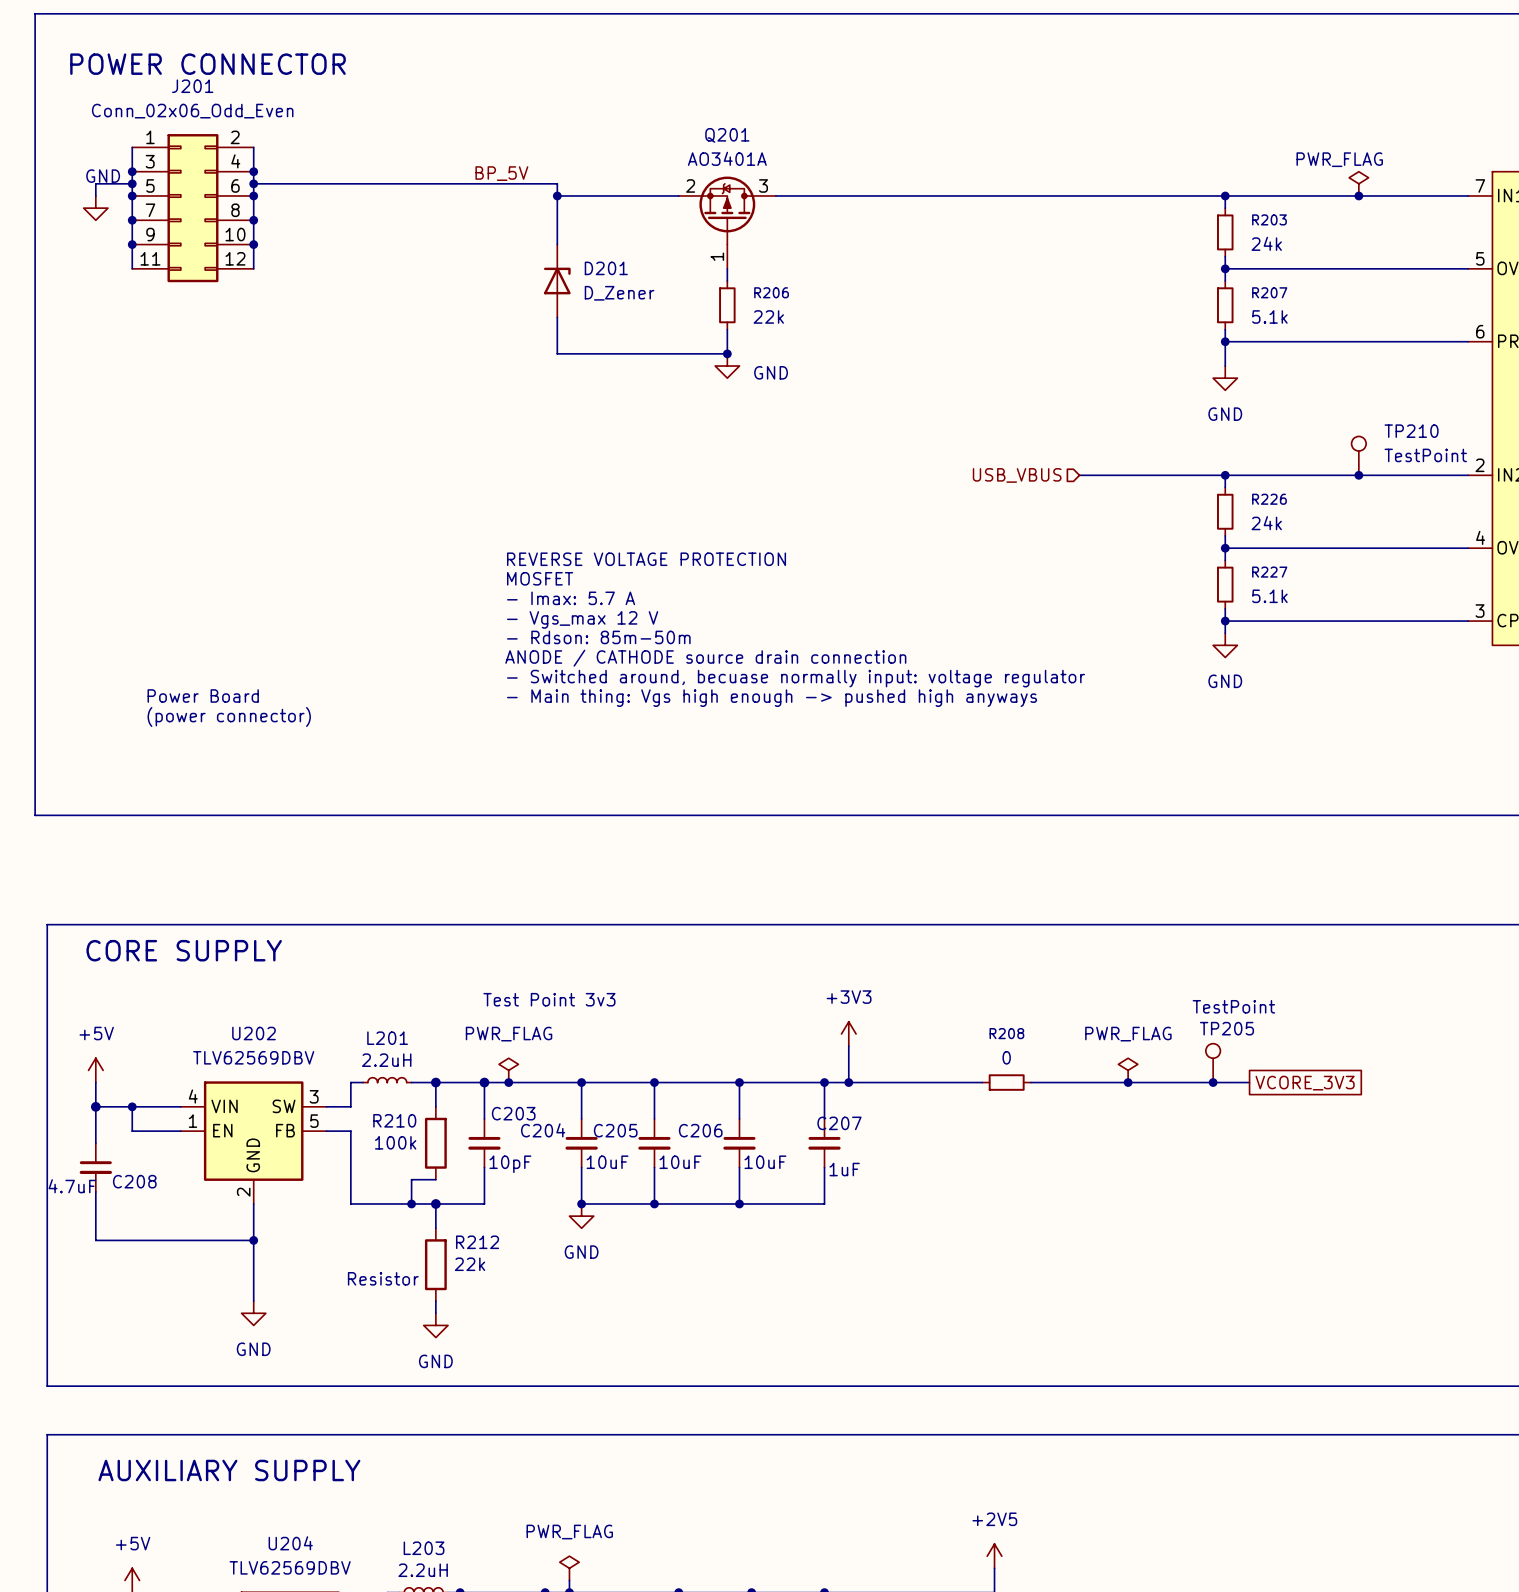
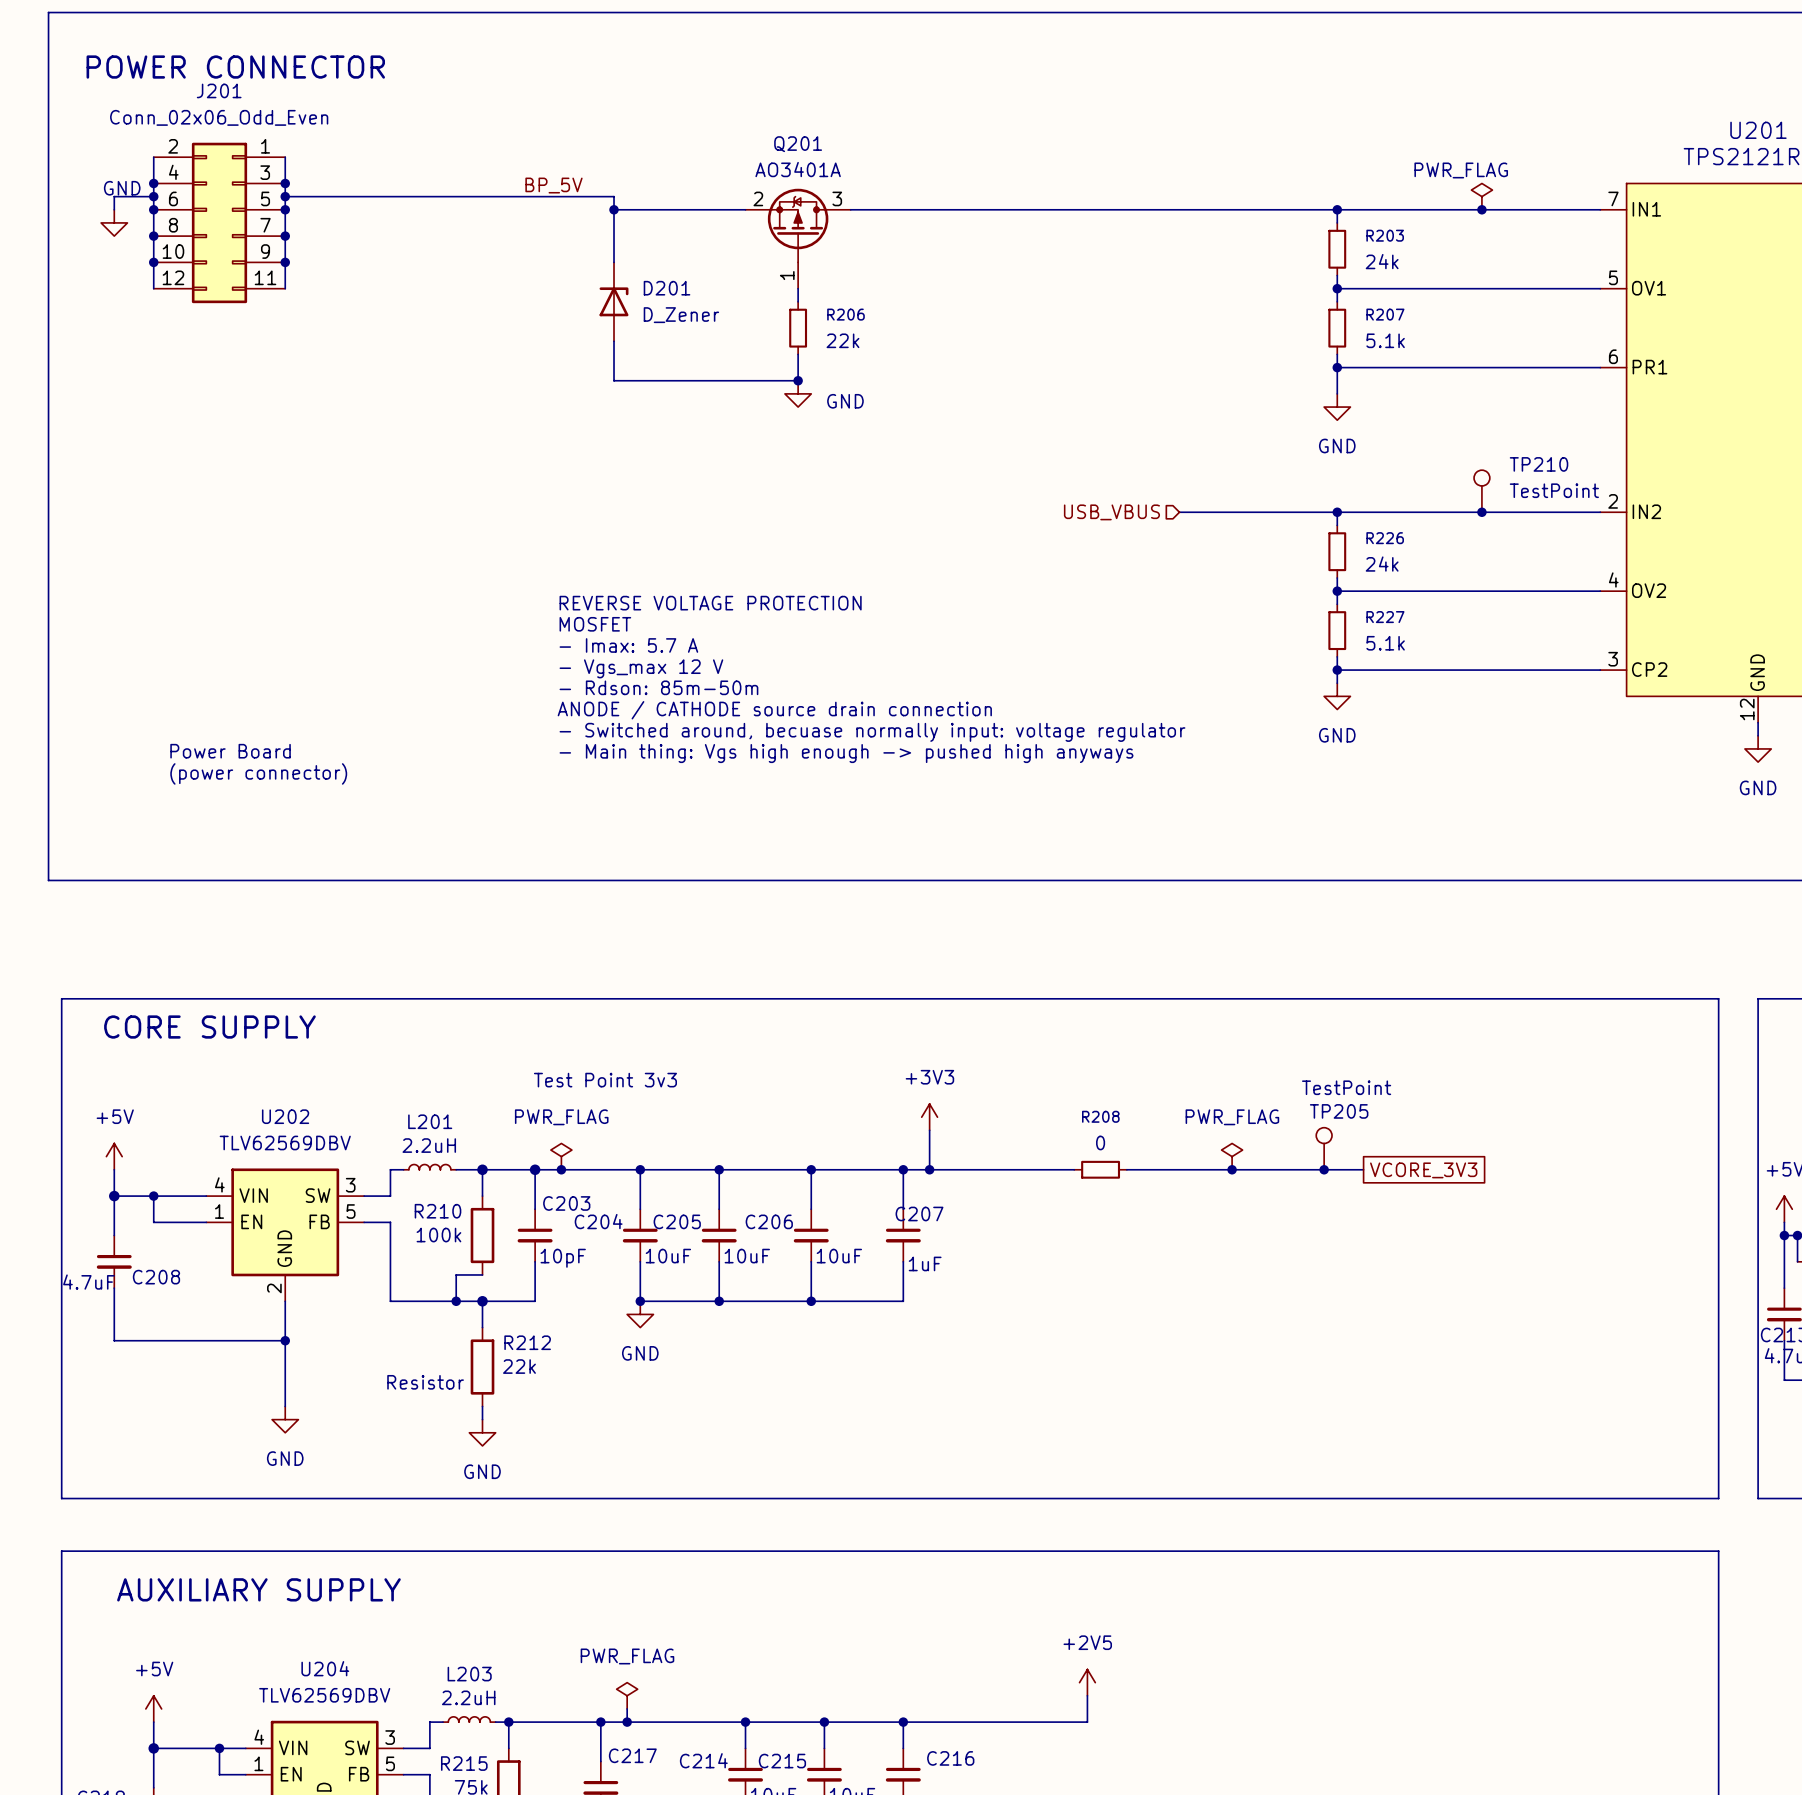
J201 flip: as is (192, 208) -> left-right (219, 222)

